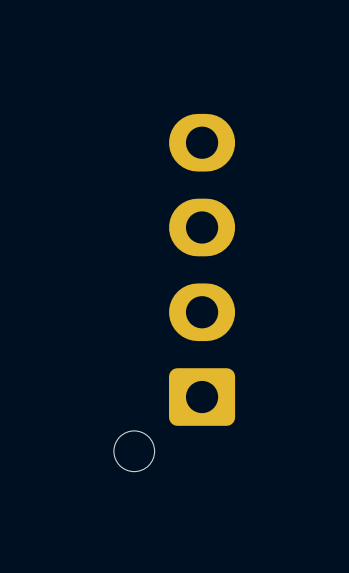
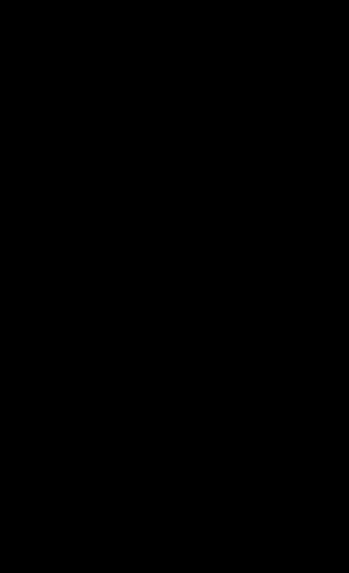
part: (174, 292) -> none

